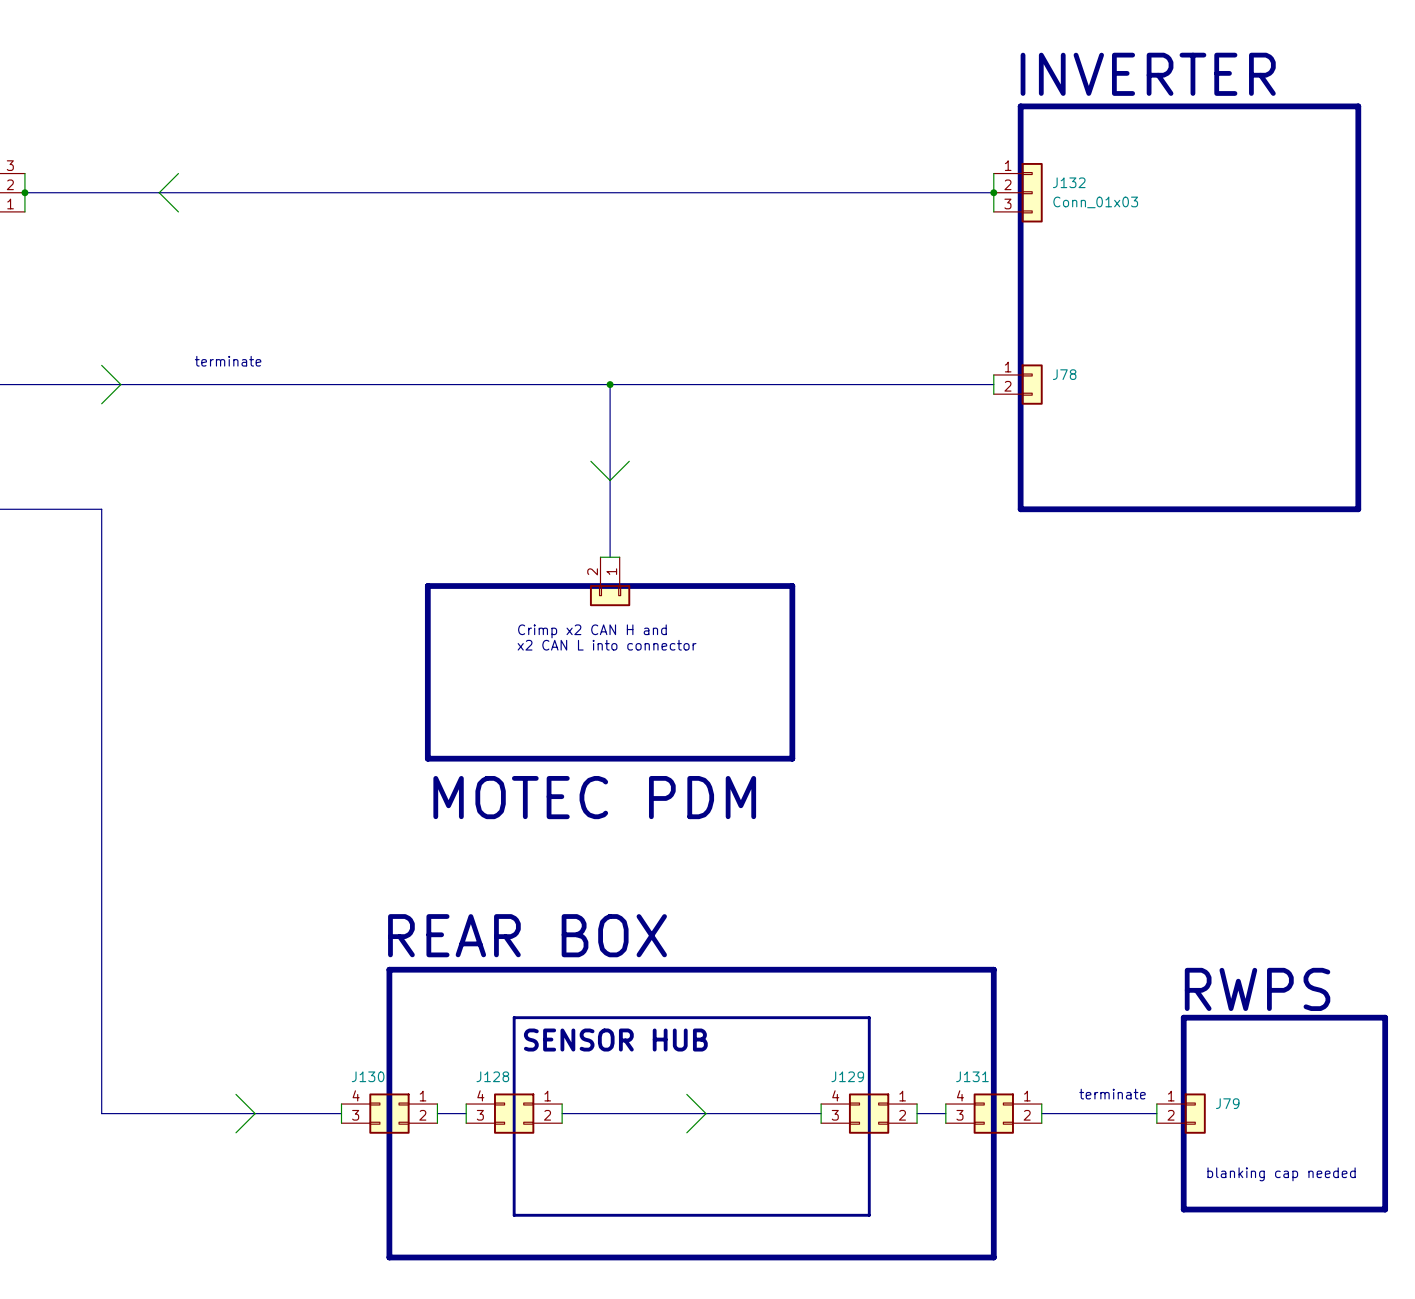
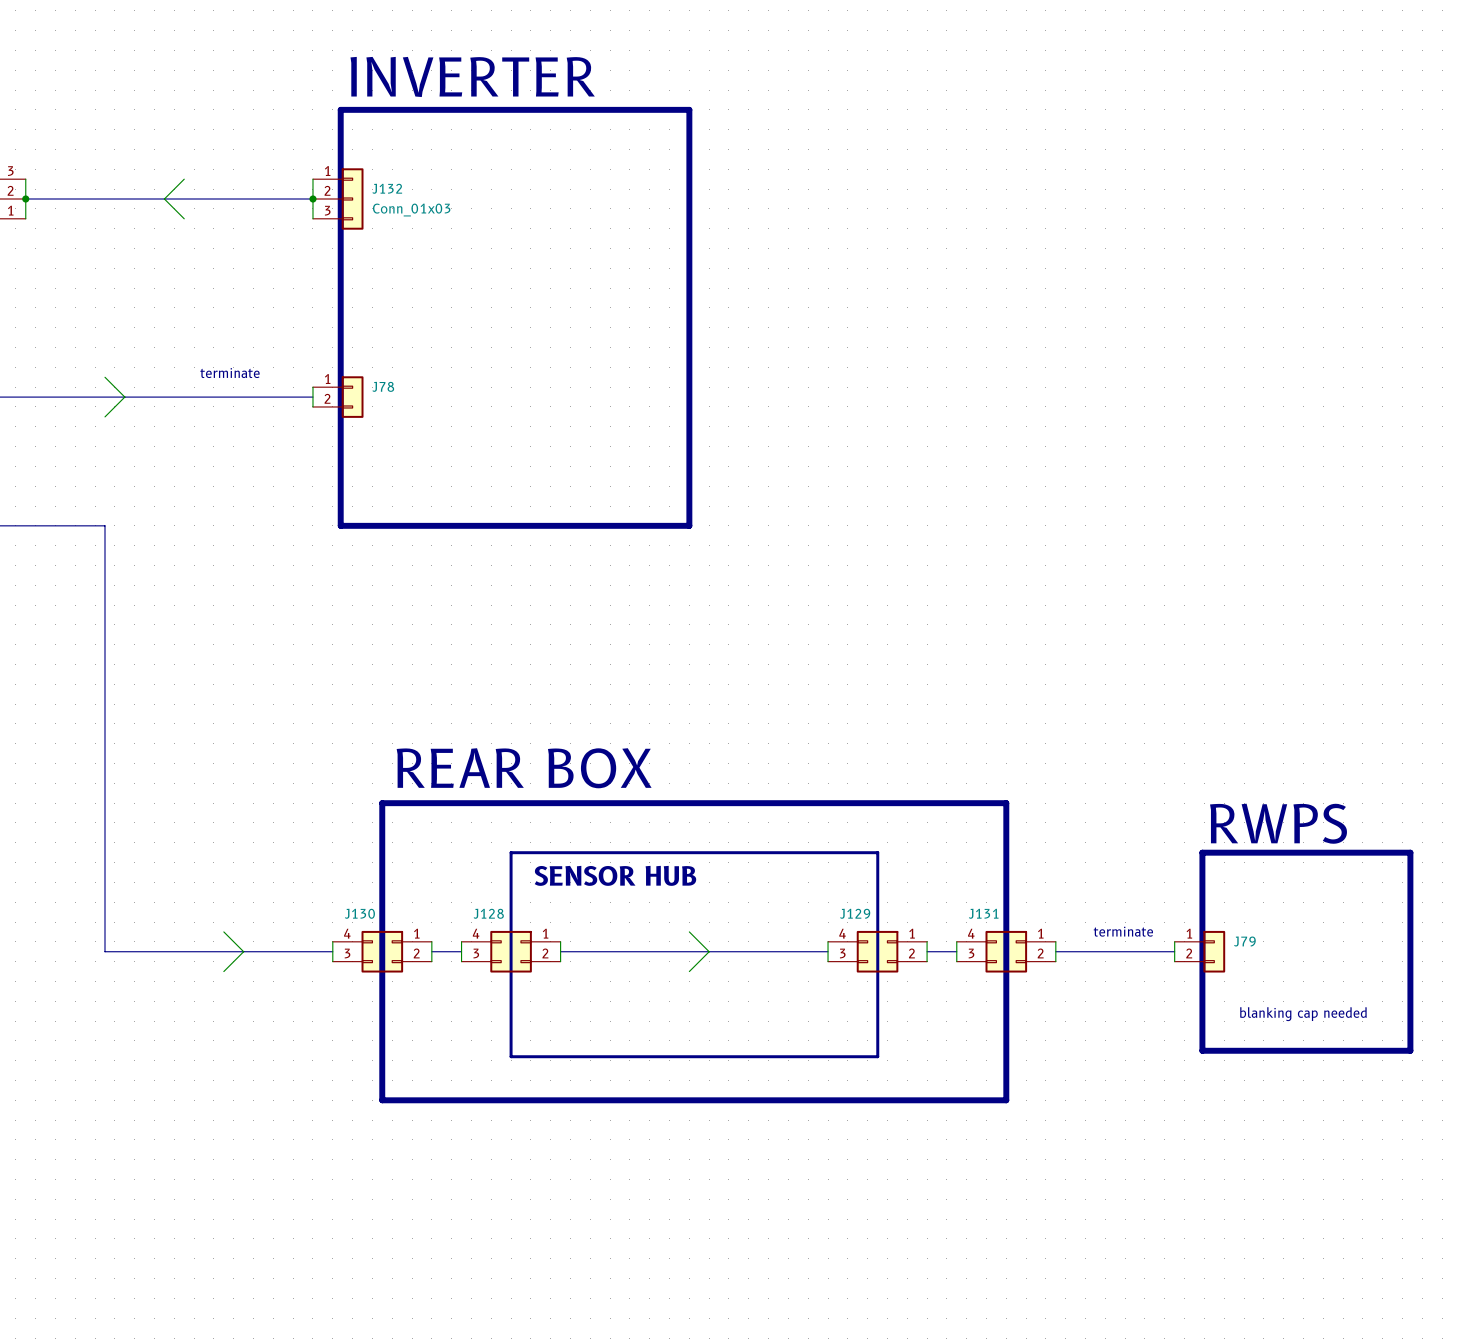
text: none -> INVERTER (472, 76)
text: INVERTER (1148, 74) -> none
line: none -> (340, 109) (689, 109) (689, 525) (340, 525) (340, 109)
line: (1020, 106) (1358, 106) (1358, 509) (1020, 509) (1020, 106) -> none
wire: none -> (312, 179) (312, 218)
wire: (993, 173) (993, 211) -> none
bus: (303, 192) (993, 192) -> none
junction: none -> (312, 199)
junction: (993, 192) -> none
J132 position: (1018, 192) -> (338, 199)
wire: none -> (312, 387) (312, 406)
wire: (993, 374) (993, 394) -> none
bus: (303, 384) (993, 384) -> none
bus: (610, 384) (610, 557) -> none
junction: (610, 384) -> none
J78 position: (1018, 384) -> (338, 397)
wire: (590, 461) (610, 480) (629, 461) -> none
wire: (600, 557) (619, 557) -> none
part: (610, 581) -> none
line: (427, 586) (792, 586) (792, 758) (427, 758) (427, 586) -> none
text: Crimp x2 CAN H and (592, 631) -> none
text: x2 CAN L into connector (607, 645) -> none
text: none -> REAR BOX (524, 768)
line: none -> (382, 803) (1006, 803) (1006, 1100) (382, 1100) (382, 803)
text: MOTEC PDM (594, 797) -> none
text: none -> RWPS (1278, 823)
line: none -> (511, 852) (877, 852) (877, 1056) (511, 1056) (511, 852)
text: none -> SENSOR HUB (615, 875)
wire: none -> (223, 931) (243, 951) (223, 971)
wire: none -> (689, 931) (709, 951) (689, 971)
text: none -> terminate (1123, 931)
wire: none -> (332, 941) (332, 961)
wire: none -> (431, 941) (431, 961)
wire: none -> (461, 941) (461, 961)
wire: none -> (560, 941) (560, 961)
wire: none -> (828, 941) (828, 961)
wire: none -> (927, 941) (927, 961)
wire: none -> (956, 941) (956, 961)
wire: none -> (1055, 941) (1055, 961)
wire: none -> (1174, 941) (1174, 961)
bus: (101, 921) (101, 1113) (341, 1113) -> (104, 951) (332, 951)
bus: none -> (431, 951) (461, 951)
bus: none -> (560, 951) (828, 951)
bus: none -> (927, 951) (956, 951)
bus: none -> (1055, 951) (1174, 951)
text: REAR BOX (527, 935) -> none
line: (389, 969) (993, 969) (993, 1257) (389, 1257) (389, 969) -> none
text: none -> blanking cap needed (1303, 1014)
text: RWPS (1257, 989) -> none
line: (514, 1017) (869, 1017) (869, 1215) (514, 1215) (514, 1017) -> none
line: (1183, 1017) (1183, 1209) (1385, 1209) (1385, 1017) (1365, 1017) -> (1222, 1050) (1202, 1050) (1202, 852) (1410, 852) (1410, 1050)
text: SENSOR HUB (615, 1040) -> none
wire: (235, 1094) (255, 1113) (235, 1132) -> none
wire: (686, 1094) (706, 1113) (686, 1132) -> none
text: terminate (1112, 1094) -> none
wire: (341, 1104) (341, 1123) -> none
wire: (437, 1104) (437, 1123) -> none
wire: (466, 1104) (466, 1123) -> none
wire: (562, 1104) (562, 1123) -> none
wire: (821, 1104) (821, 1123) -> none
wire: (917, 1104) (917, 1123) -> none
wire: (945, 1104) (945, 1123) -> none
wire: (1041, 1104) (1041, 1123) -> none
wire: (1156, 1104) (1156, 1123) -> none
J130 position: (389, 1113) -> (382, 951)
bus: (437, 1113) (466, 1113) -> none
J128 position: (514, 1113) -> (511, 951)
bus: (562, 1113) (821, 1113) -> none
J129 position: (869, 1113) -> (877, 951)
bus: (917, 1113) (945, 1113) -> none
J131 position: (993, 1113) -> (1006, 951)
bus: (1041, 1113) (1156, 1113) -> none
J79 position: (1181, 1113) -> (1199, 951)
text: blanking cap needed (1281, 1174) -> none

